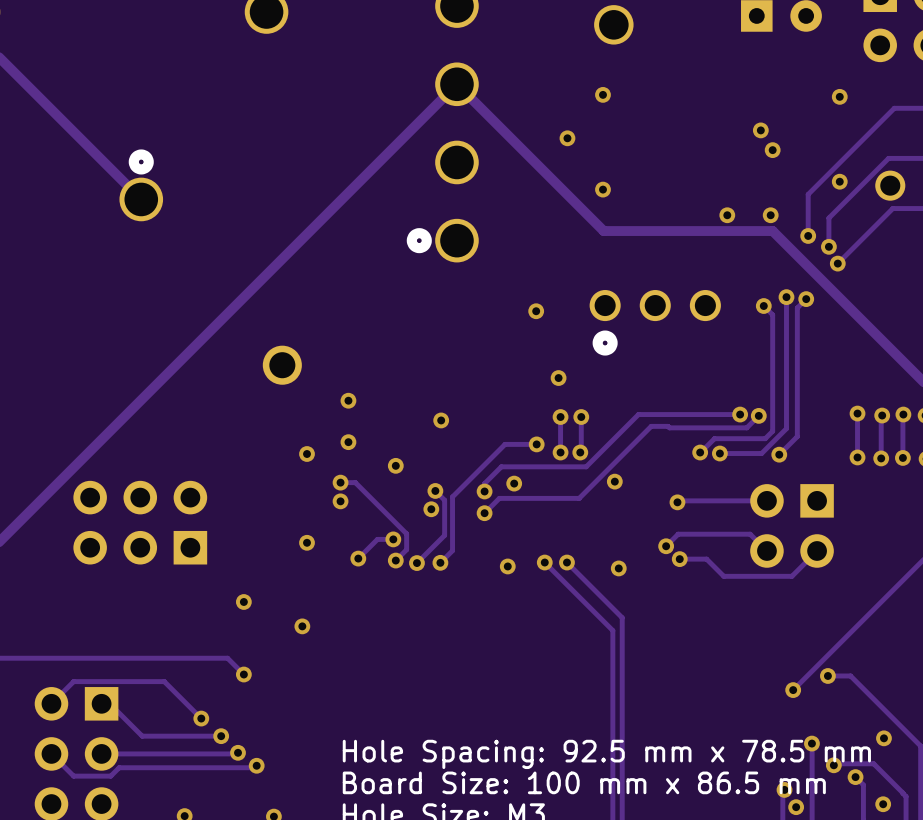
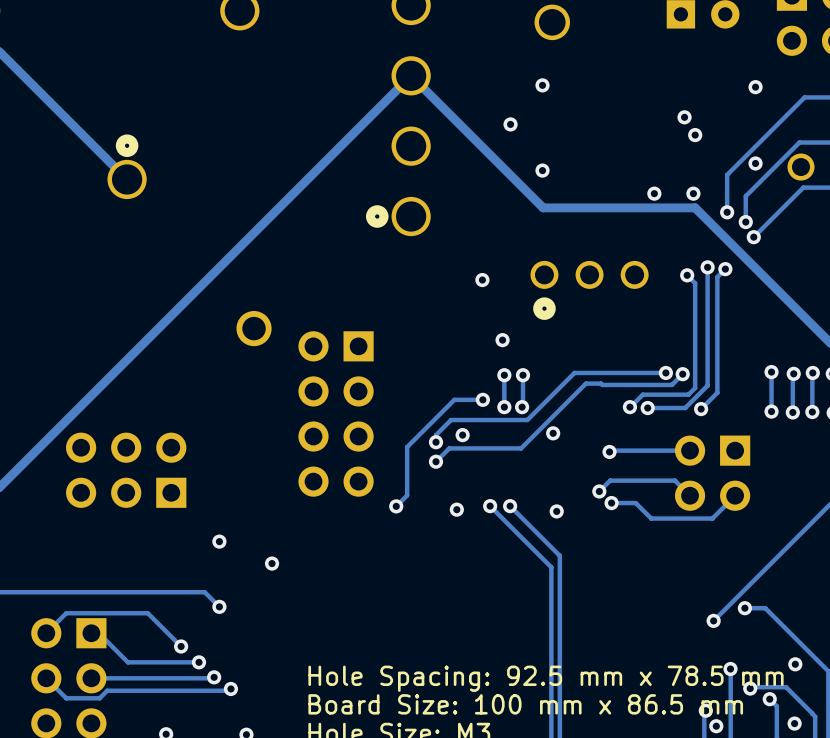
via: (348, 400) -> none
via: (441, 420) -> none
via: (348, 442) -> none
via: (307, 454) -> none
part: none -> (336, 413)
via: (395, 465) -> none
track: (340, 482) (355, 482) (406, 533) (406, 549) (395, 560) -> none
via: (340, 482) -> none
track: (435, 490) (444, 500) (444, 535) (416, 563) -> none
via: (435, 490) -> none
via: (340, 501) -> none
via: (431, 509) -> none
track: (393, 539) (377, 539) (358, 558) -> none
via: (393, 539) -> none
via: (307, 542) -> none
via: (358, 558) -> none
via: (395, 560) -> none
via: (416, 563) -> none

